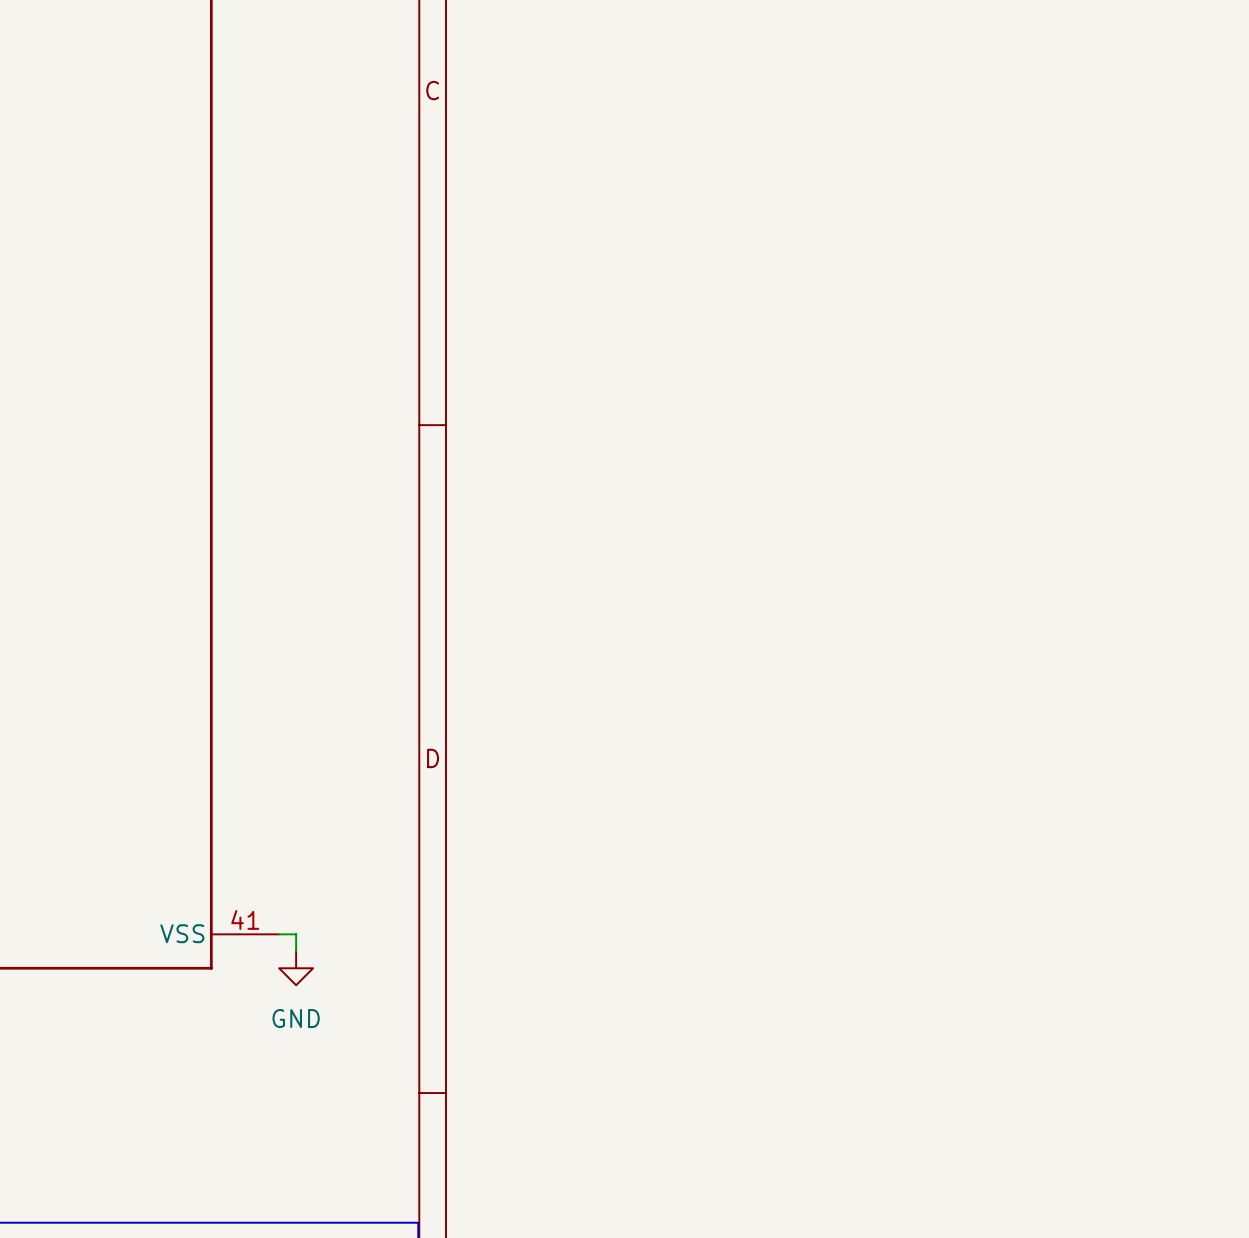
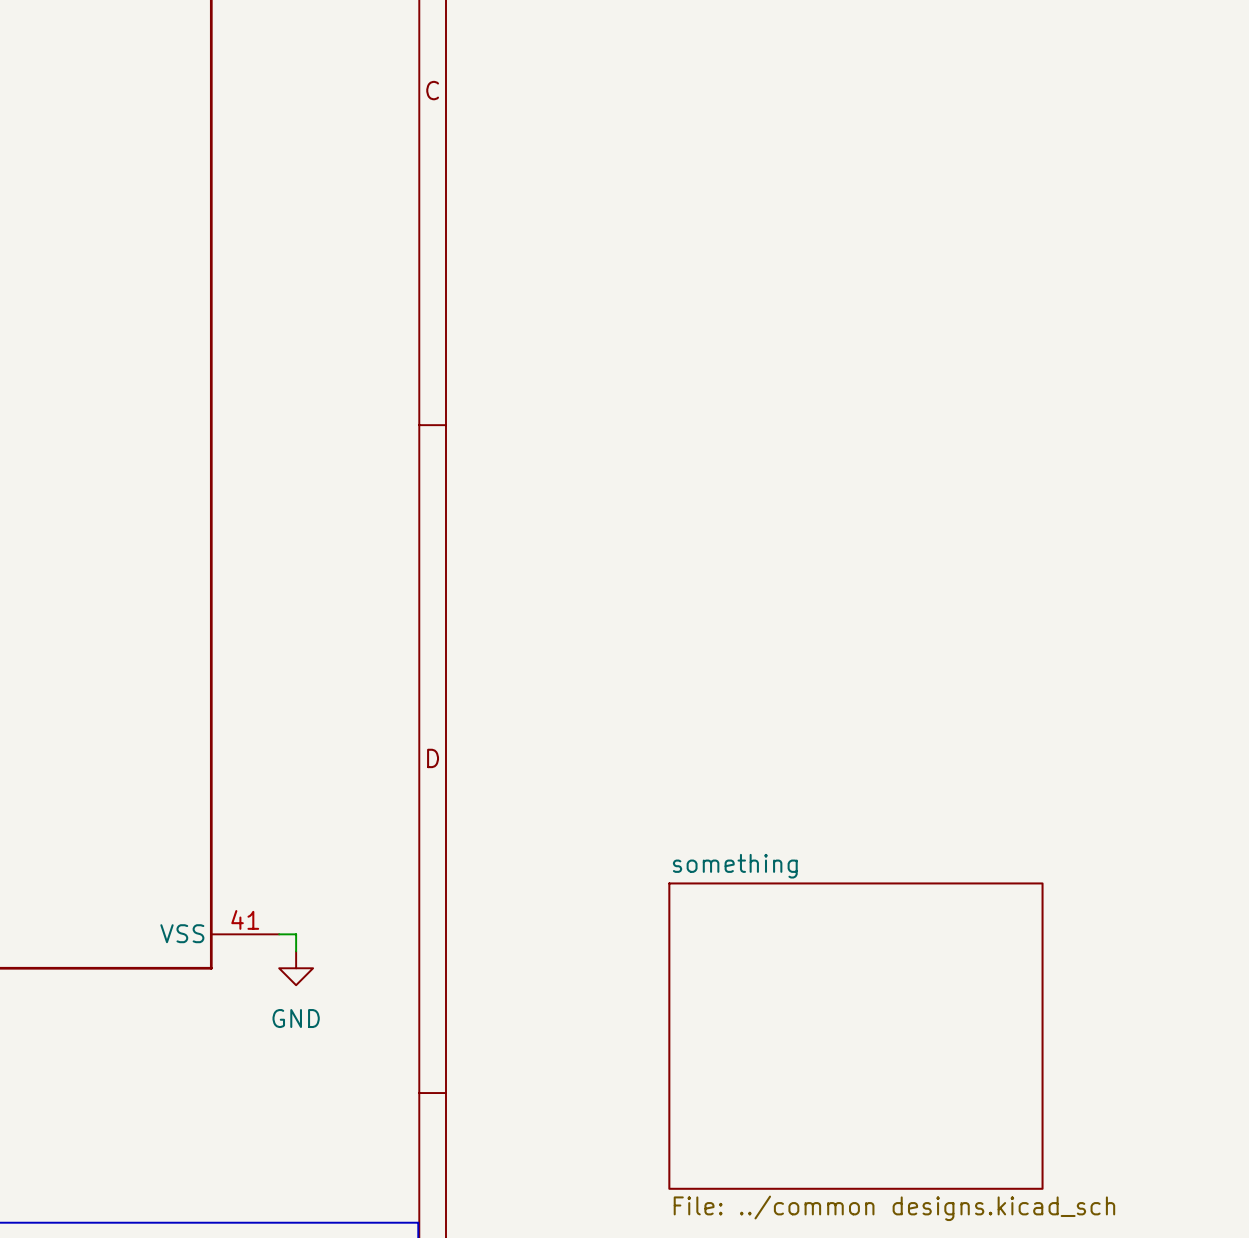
sheet something: none -> File: ../common designs.kicad_sch (855, 1036)

